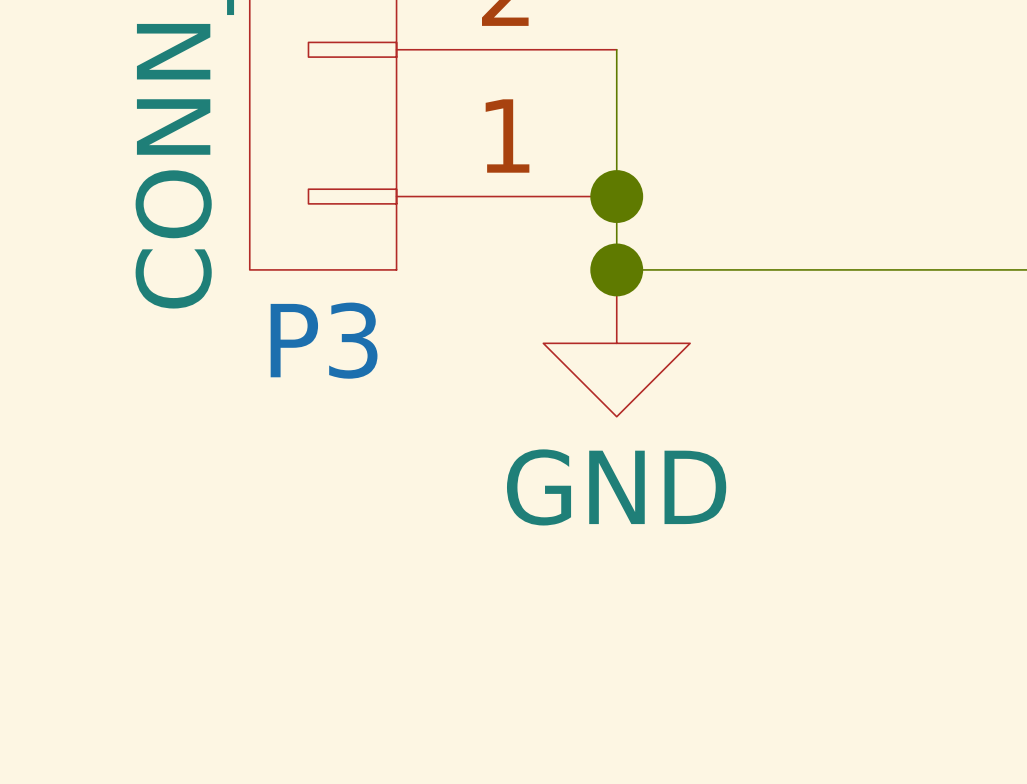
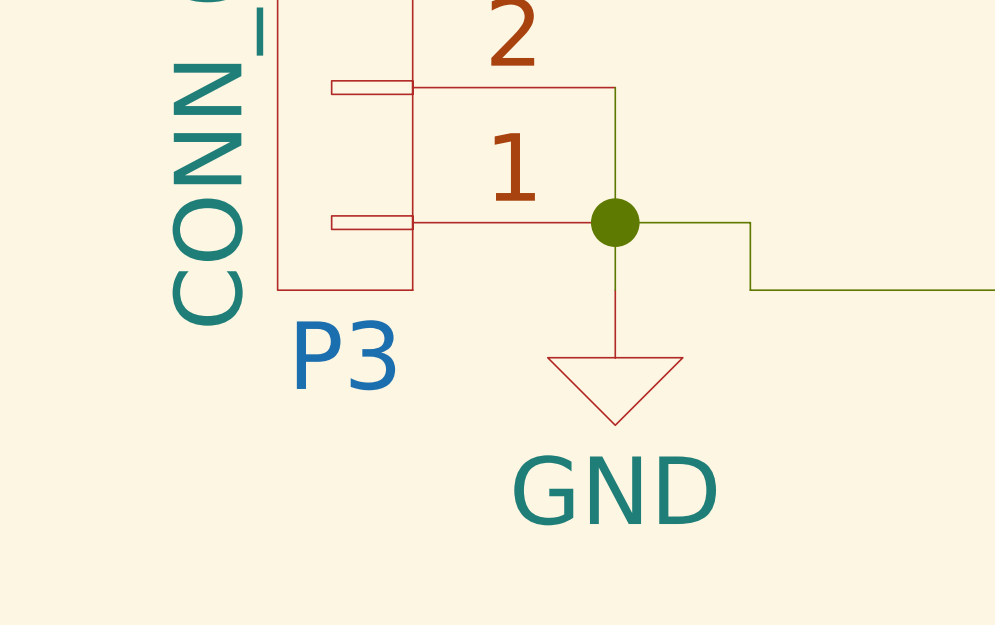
wire: (616, 269) (763, 269) -> (615, 222) (750, 222) (750, 290)
junction: (616, 269) -> none

